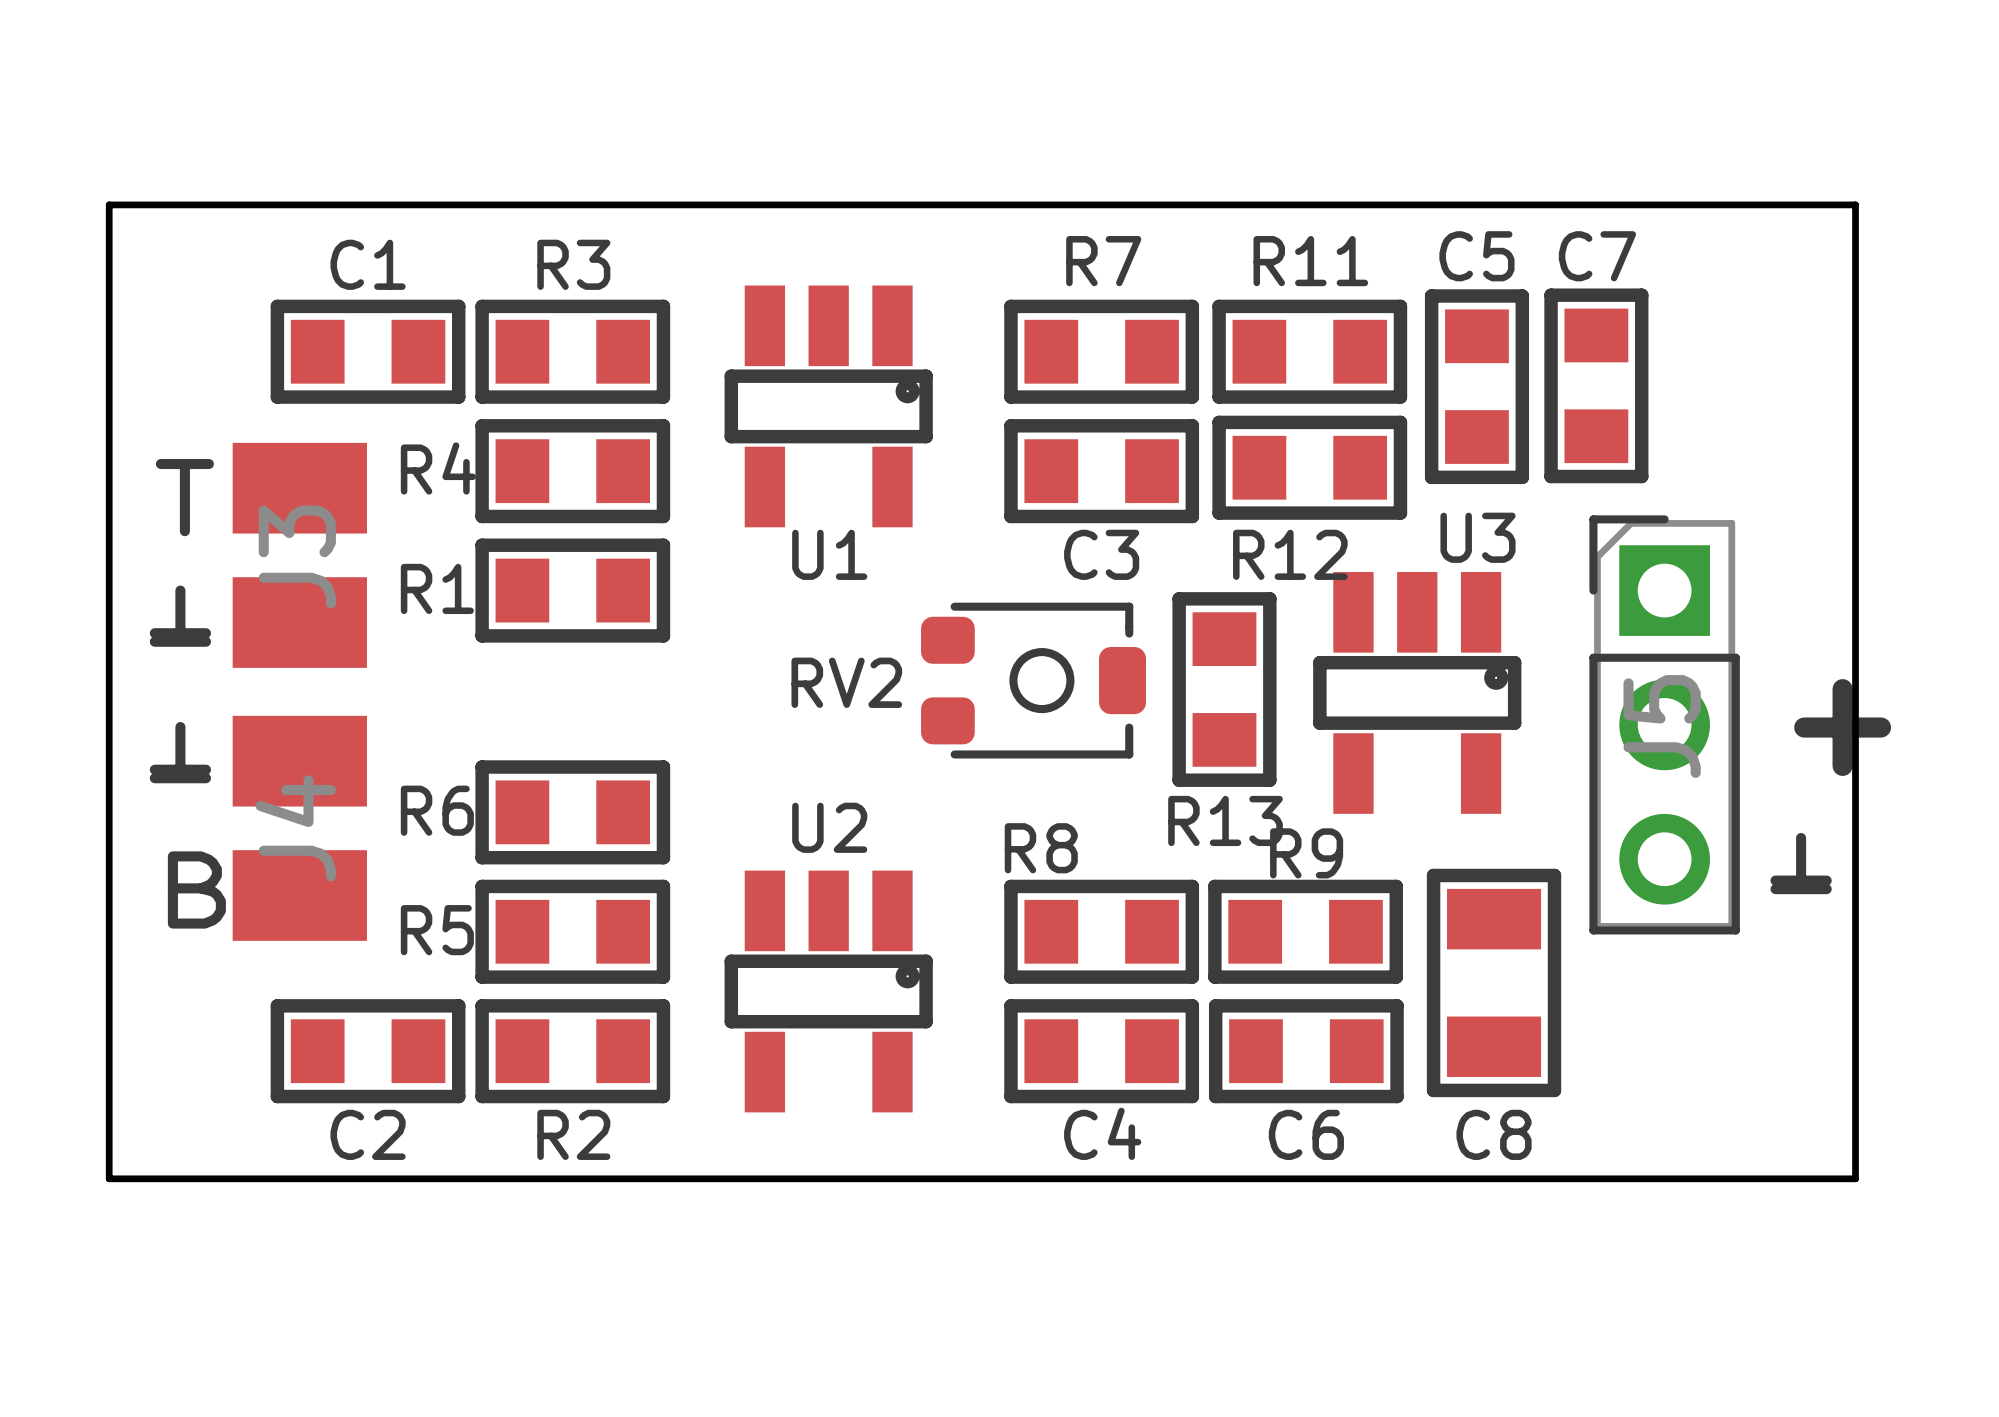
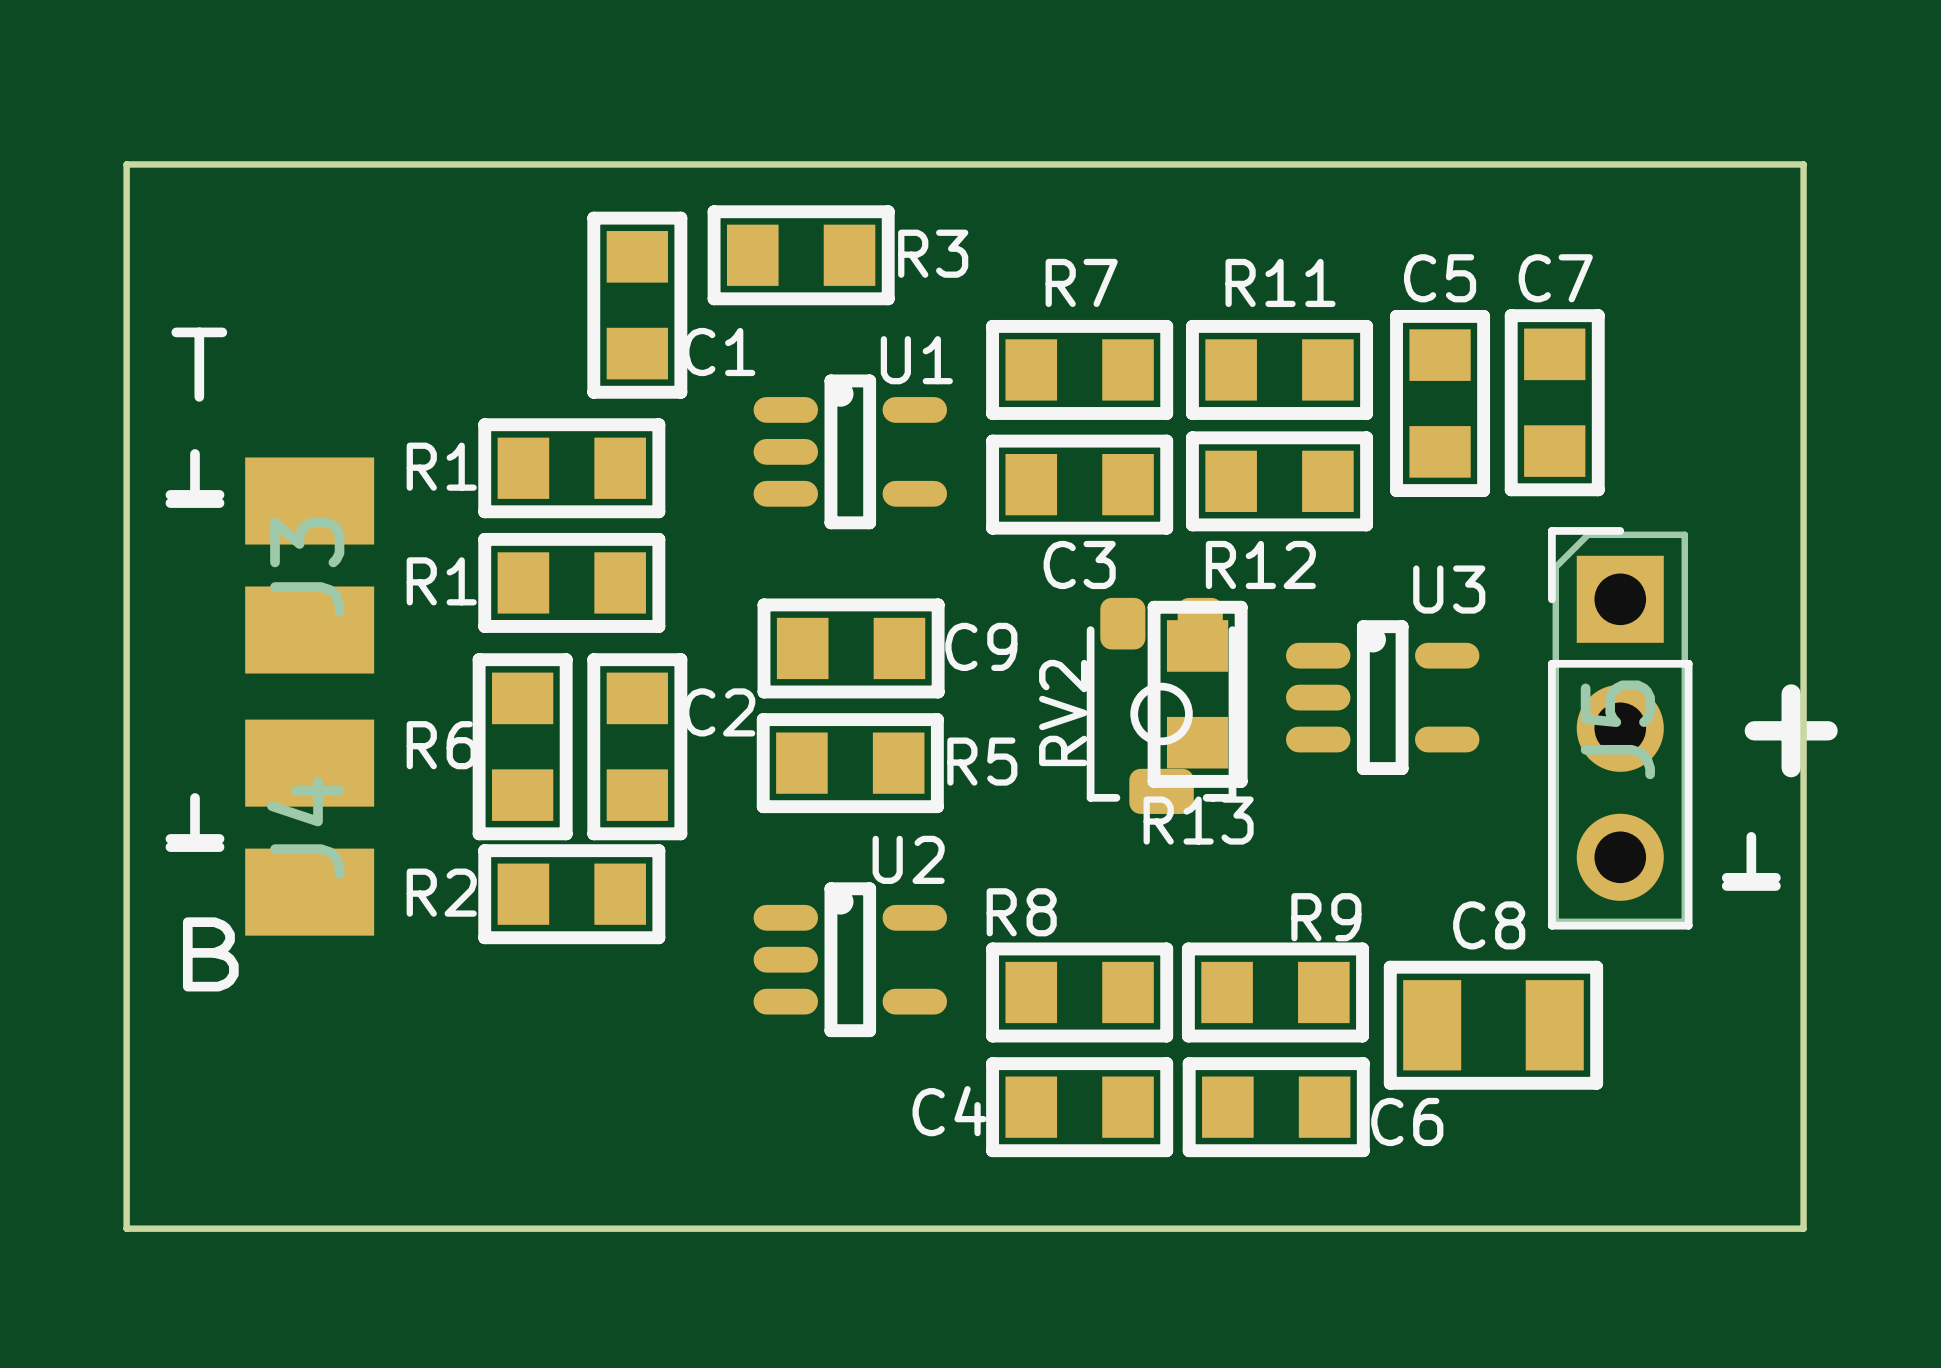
board edge: (109, 204) (1855, 204) -> (126, 228) (126, 164) (1803, 164) (1803, 228)
R3 name position: R3 (573, 264) -> R3 (933, 253)
U1 footprint: [724, 285, 933, 528] -> [753, 374, 948, 530]
C1 rotation: 0° (368, 351) -> 90° clockwise (637, 305)
C1 position: (368, 351) -> (637, 305)
R3 position: (572, 351) -> (801, 255)
R4 name: R4 (438, 468) -> R1 (441, 466)
R4 position: (572, 471) -> (571, 468)
text position: T (184, 497) -> T (199, 364)
U1 name position: U1 (829, 554) -> U1 (916, 360)
U3 footprint: [1313, 572, 1522, 814] -> [1285, 620, 1480, 776]
line: (180, 590) (180, 633) -> (195, 453) (195, 494)
R1 position: (572, 590) -> (571, 582)
line: (154, 633) (205, 633) -> (170, 494) (219, 494)
line: (154, 641) (205, 641) -> (170, 503) (219, 503)
C9: none -> (851, 648)
RV2 rotation: 0° (1033, 680) -> 90° clockwise (1161, 705)
RV2 position: (1033, 680) -> (1161, 705)
line: (180, 727) (180, 769) -> (195, 797) (195, 838)
line: (154, 769) (205, 769) -> (170, 838) (219, 838)
line: (154, 778) (205, 778) -> (170, 847) (219, 847)
R6 rotation: 0° (572, 812) -> 90° clockwise (522, 746)
R9 name position: R9 (1306, 853) -> R9 (1326, 917)
U2 footprint: [724, 870, 933, 1113] -> [753, 882, 948, 1038]
text position: B (196, 889) -> B (210, 954)
R5 name position: R5 (437, 930) -> R5 (982, 761)
R5 position: (572, 931) -> (850, 763)
R8 position: (1101, 931) -> (1079, 992)
R9 position: (1305, 931) -> (1275, 992)
C8 rotation: 0° (1494, 982) -> 90° clockwise (1493, 1025)
C2 rotation: 0° (368, 1051) -> 90° clockwise (637, 746)
C2 position: (368, 1051) -> (637, 746)
R2 position: (572, 1051) -> (571, 894)
C4 position: (1101, 1051) -> (1079, 1107)
C6 position: (1306, 1051) -> (1276, 1107)
C4 name position: C4 (1102, 1133) -> C4 (949, 1111)
C2 name position: C2 (368, 1134) -> C2 (719, 712)
R2 name position: R2 (573, 1134) -> R2 (441, 892)
C6 name position: C6 (1306, 1134) -> C6 (1407, 1121)
C8 name position: C8 (1494, 1134) -> C8 (1489, 925)
board edge: (109, 1178) (1855, 1178) -> (126, 1164) (126, 1228) (1803, 1228) (1803, 1164)

